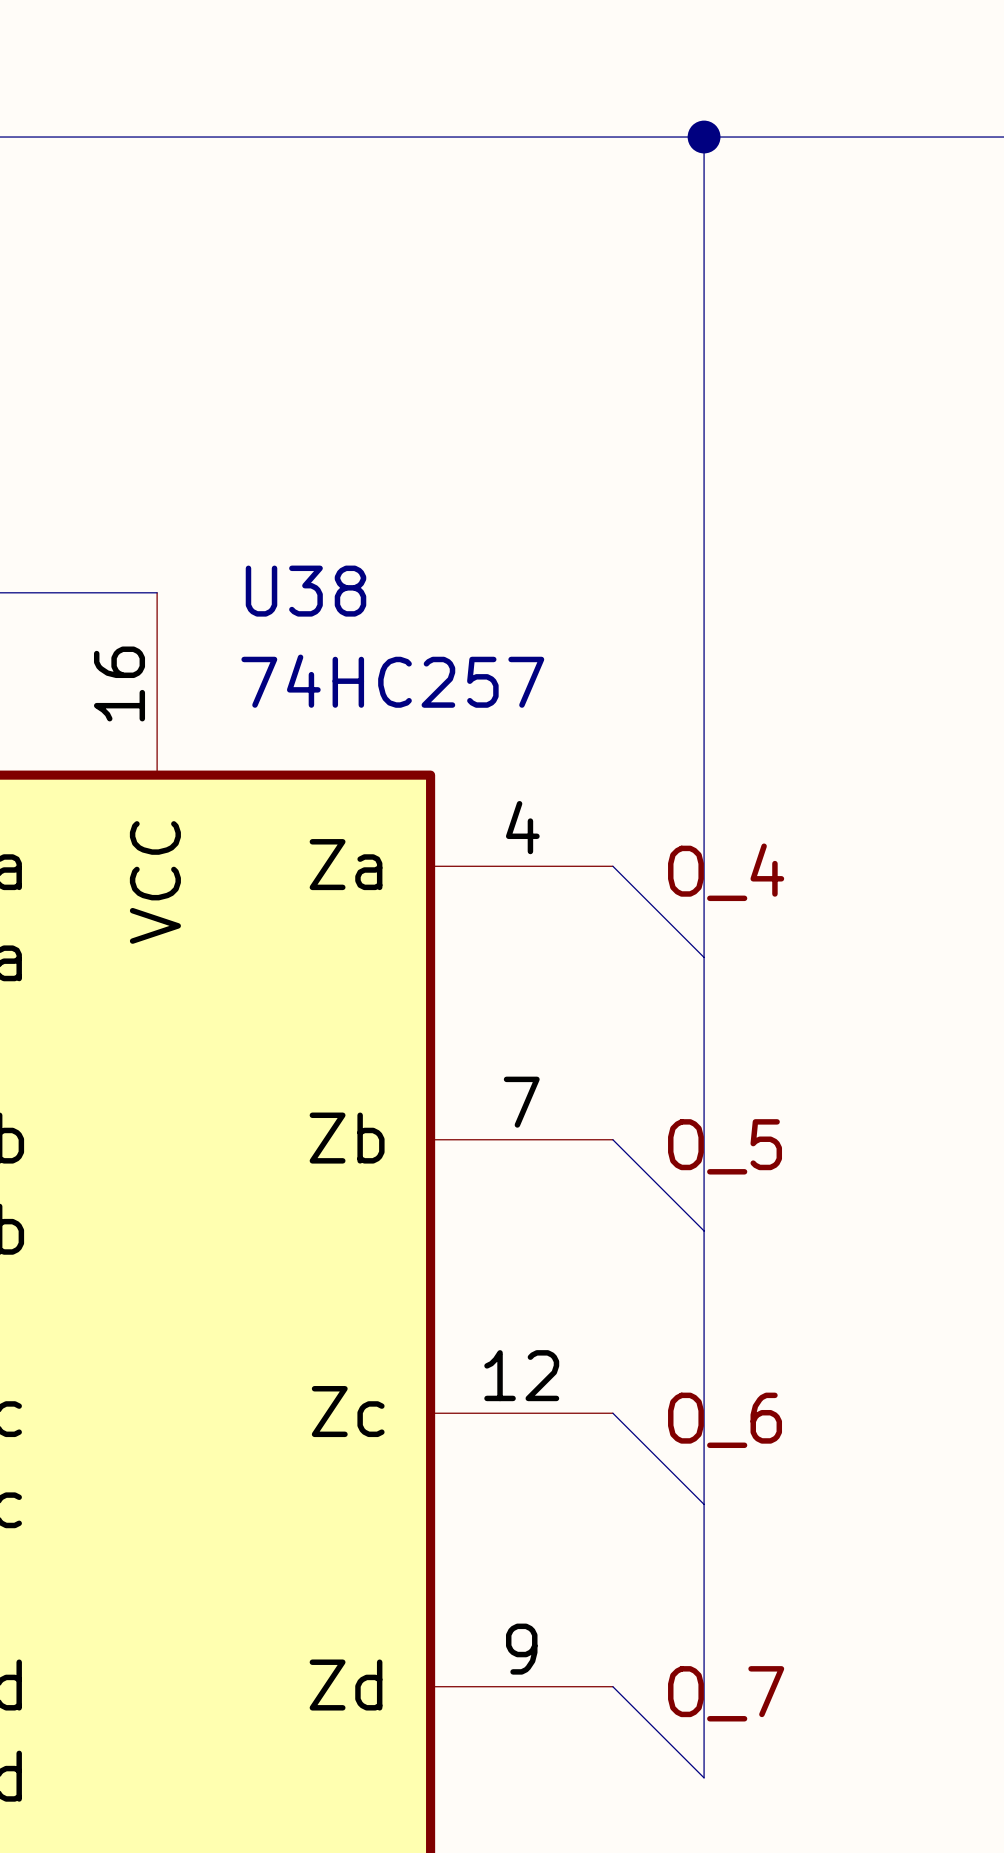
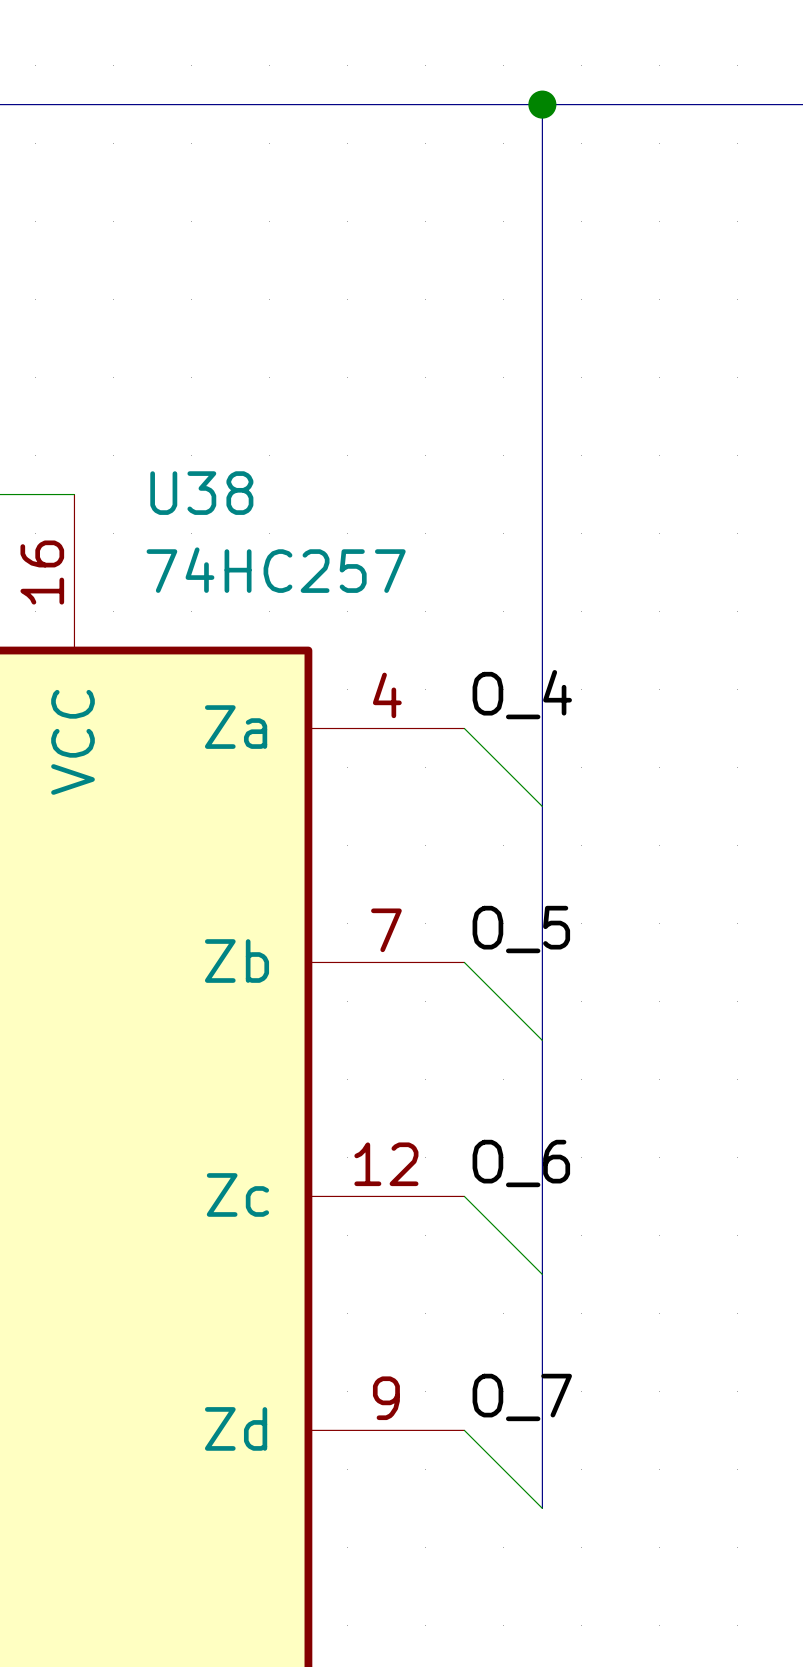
label position: O_4 (726, 872) -> O_4 (522, 694)
label position: O_5 (725, 1146) -> O_5 (521, 929)
label position: O_6 (725, 1420) -> O_6 (521, 1163)
label position: O_7 (726, 1693) -> O_7 (522, 1397)

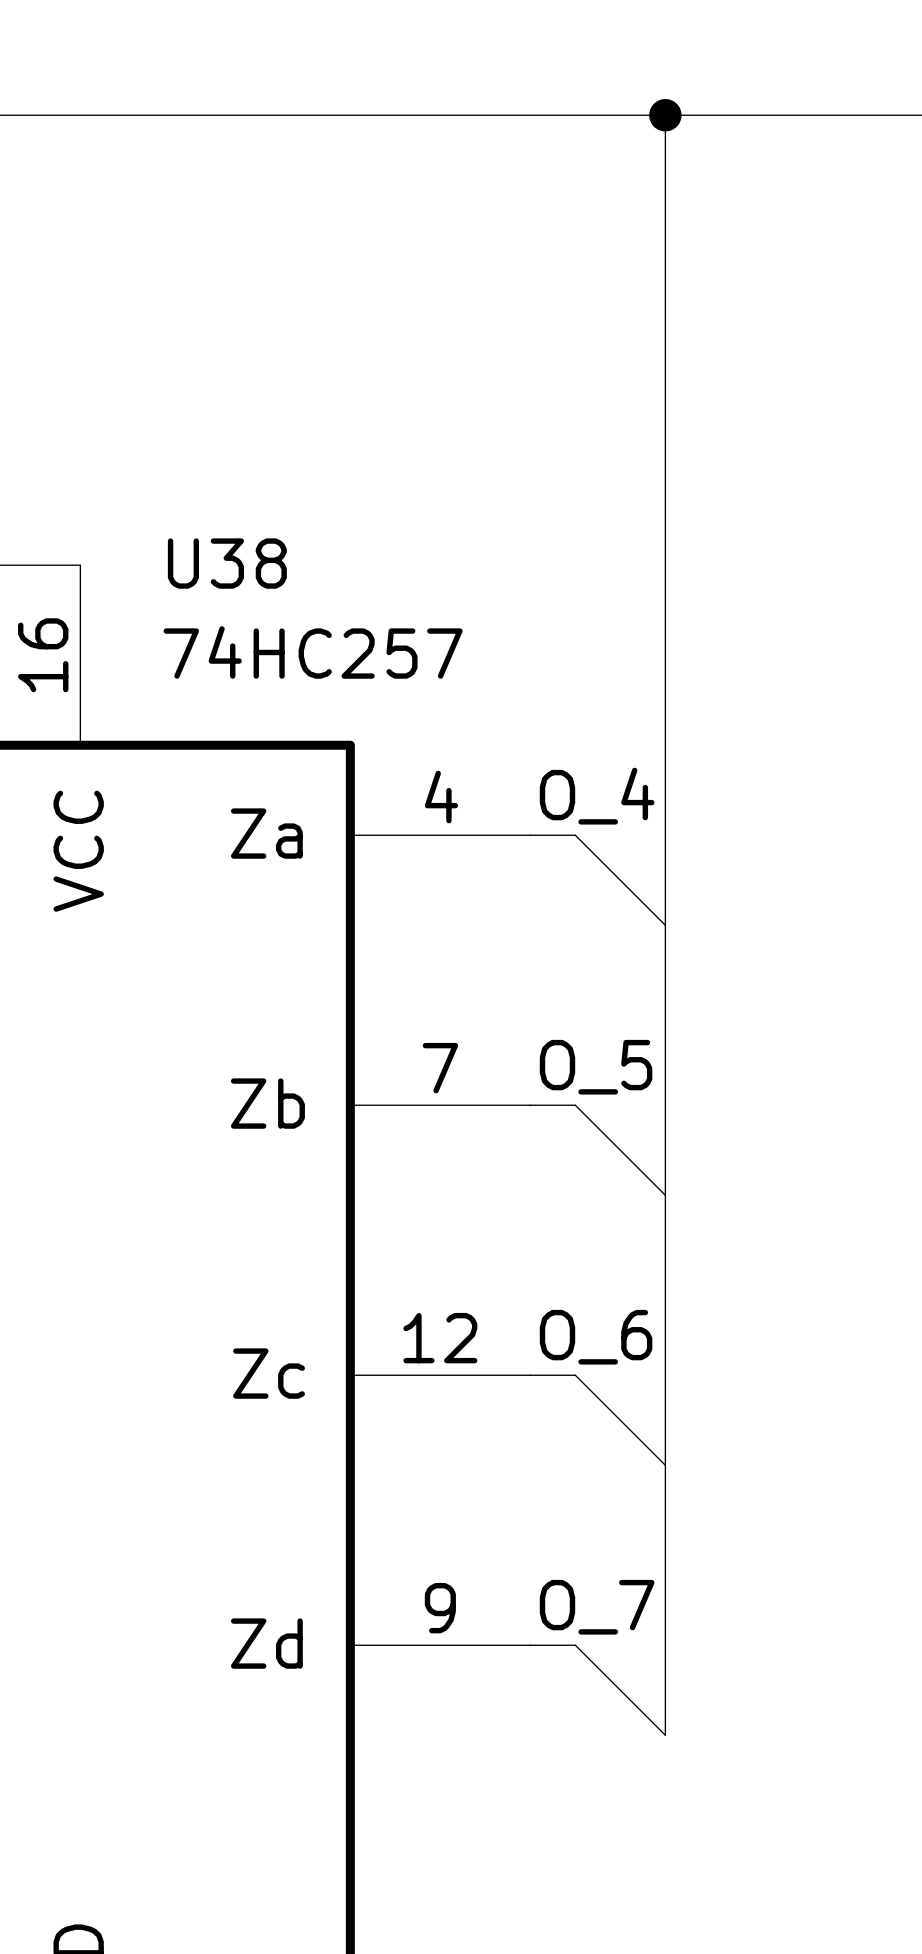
bus: (542, 104) (542, 1508) -> (665, 115) (665, 1735)
junction position: (542, 104) -> (665, 115)
wire: (464, 728) (542, 806) -> (530, 835) (575, 835) (665, 925)
wire: (464, 962) (542, 1040) -> (530, 1105) (575, 1105) (665, 1195)
wire: (464, 1196) (542, 1274) -> (530, 1375) (575, 1375) (665, 1465)
wire: (464, 1430) (542, 1508) -> (530, 1645) (575, 1645) (665, 1735)

